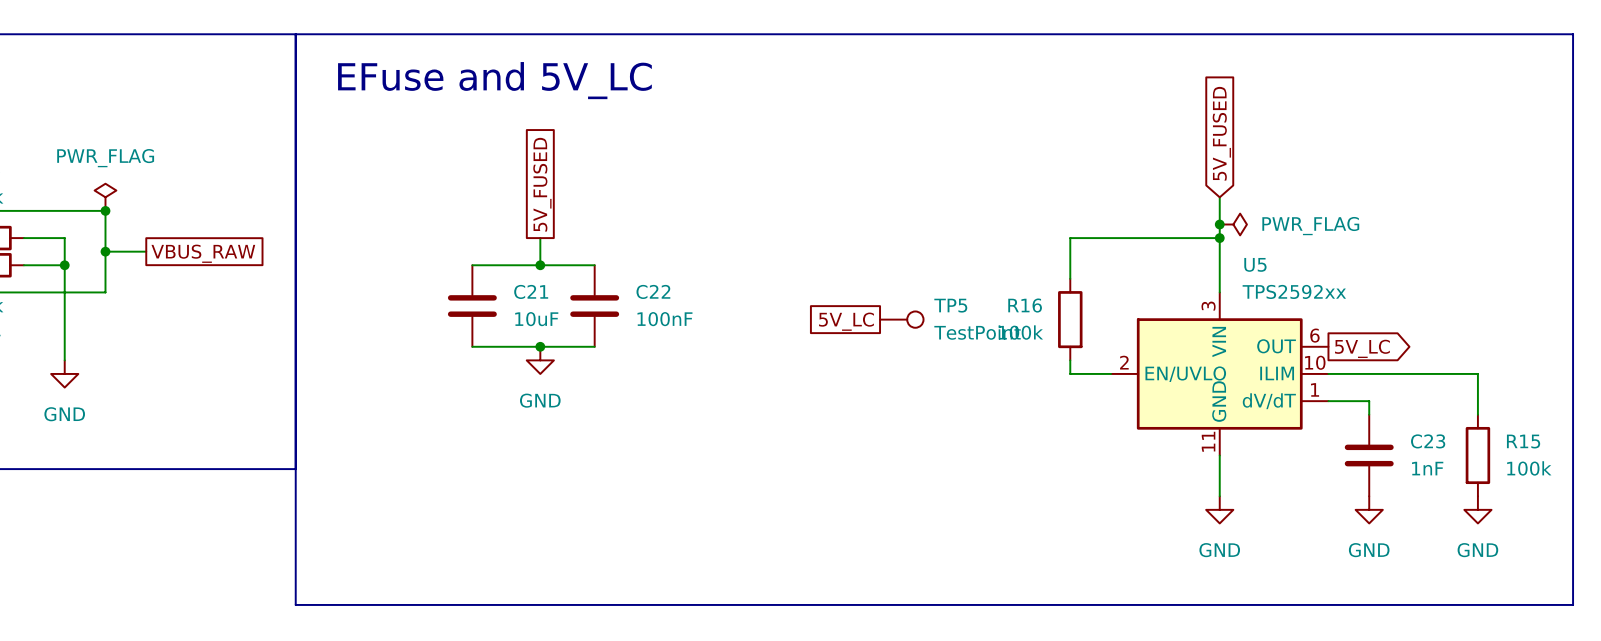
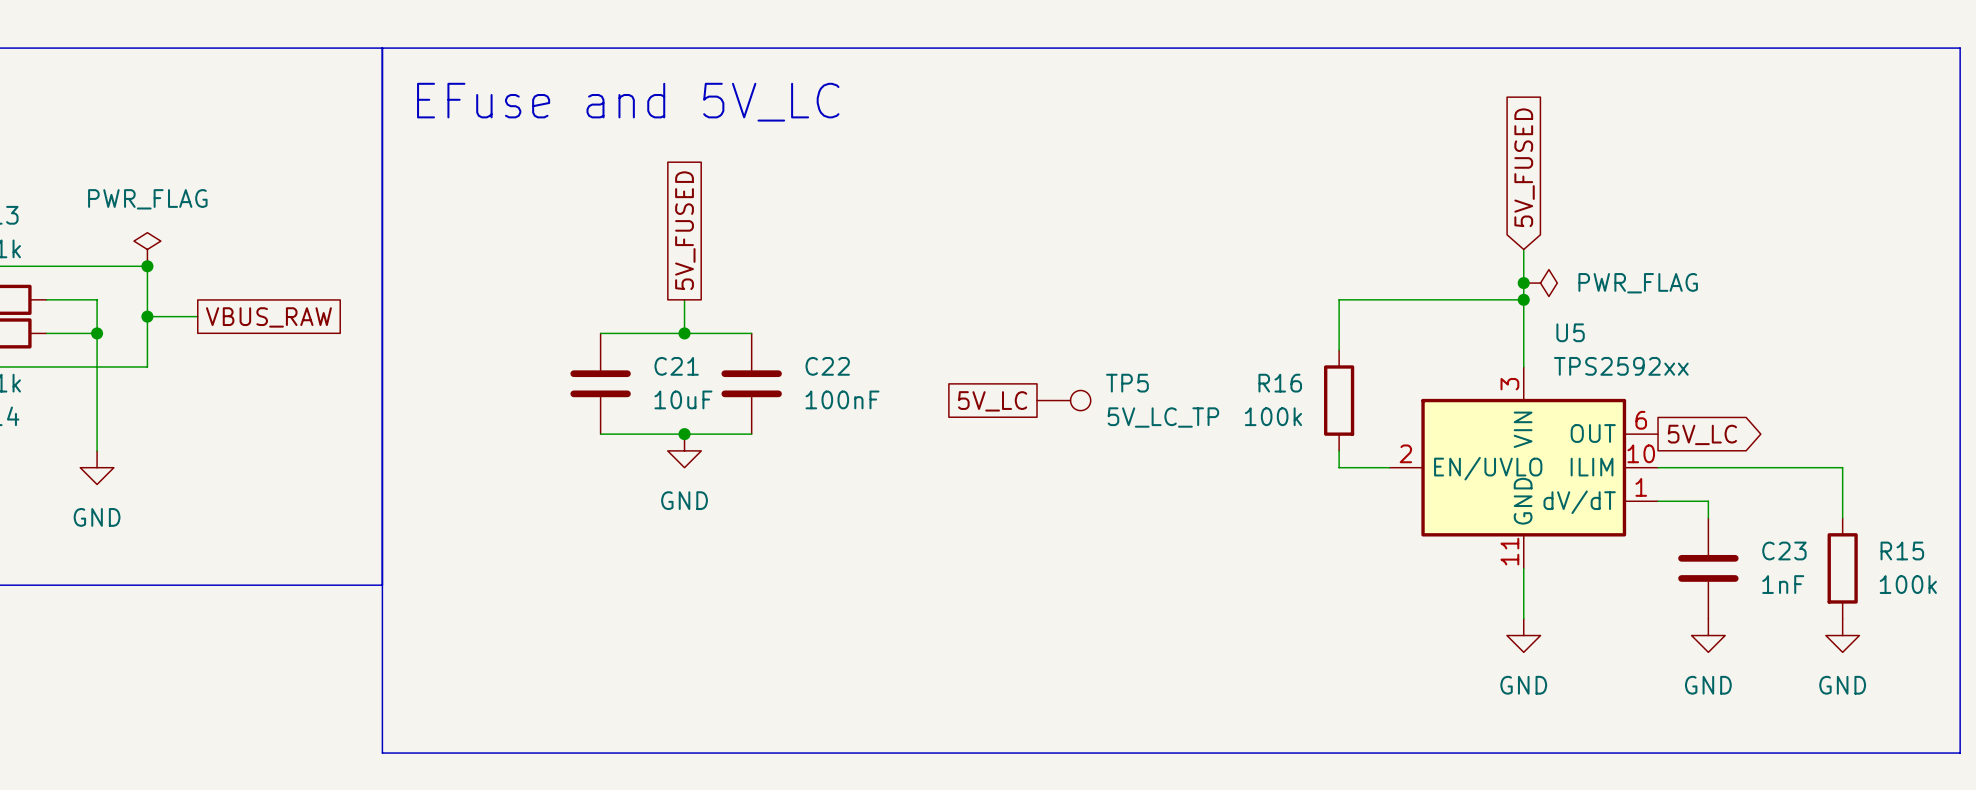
TP5 position: (901, 319) -> (1063, 400)
global label position: 5V_LC (846, 321) -> 5V_LC (992, 401)
TP5 value: TestPoint (977, 332) -> 5V_LC_TP (1163, 417)

